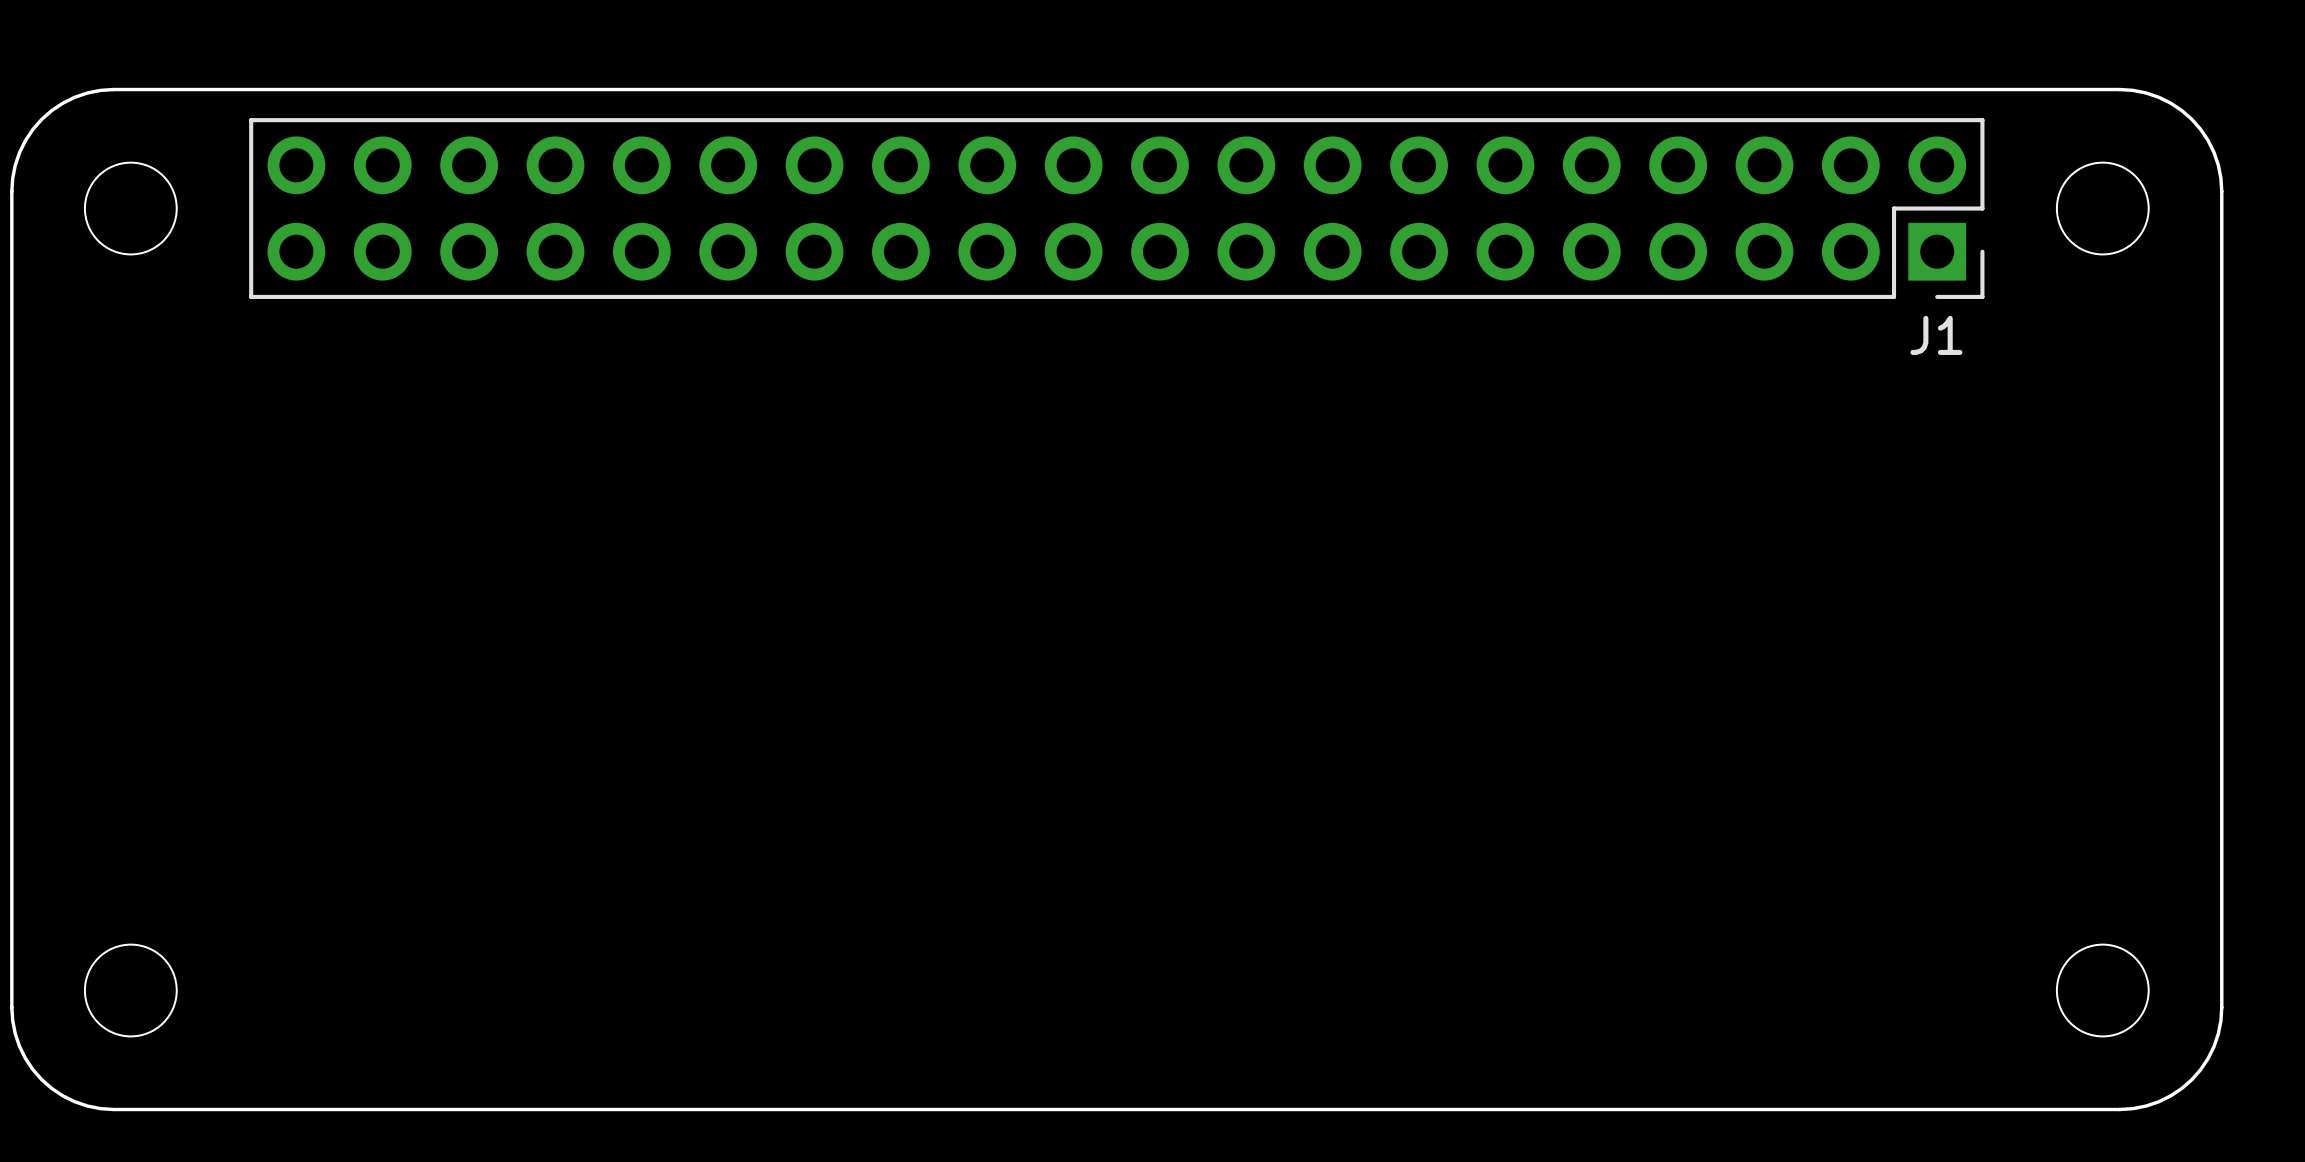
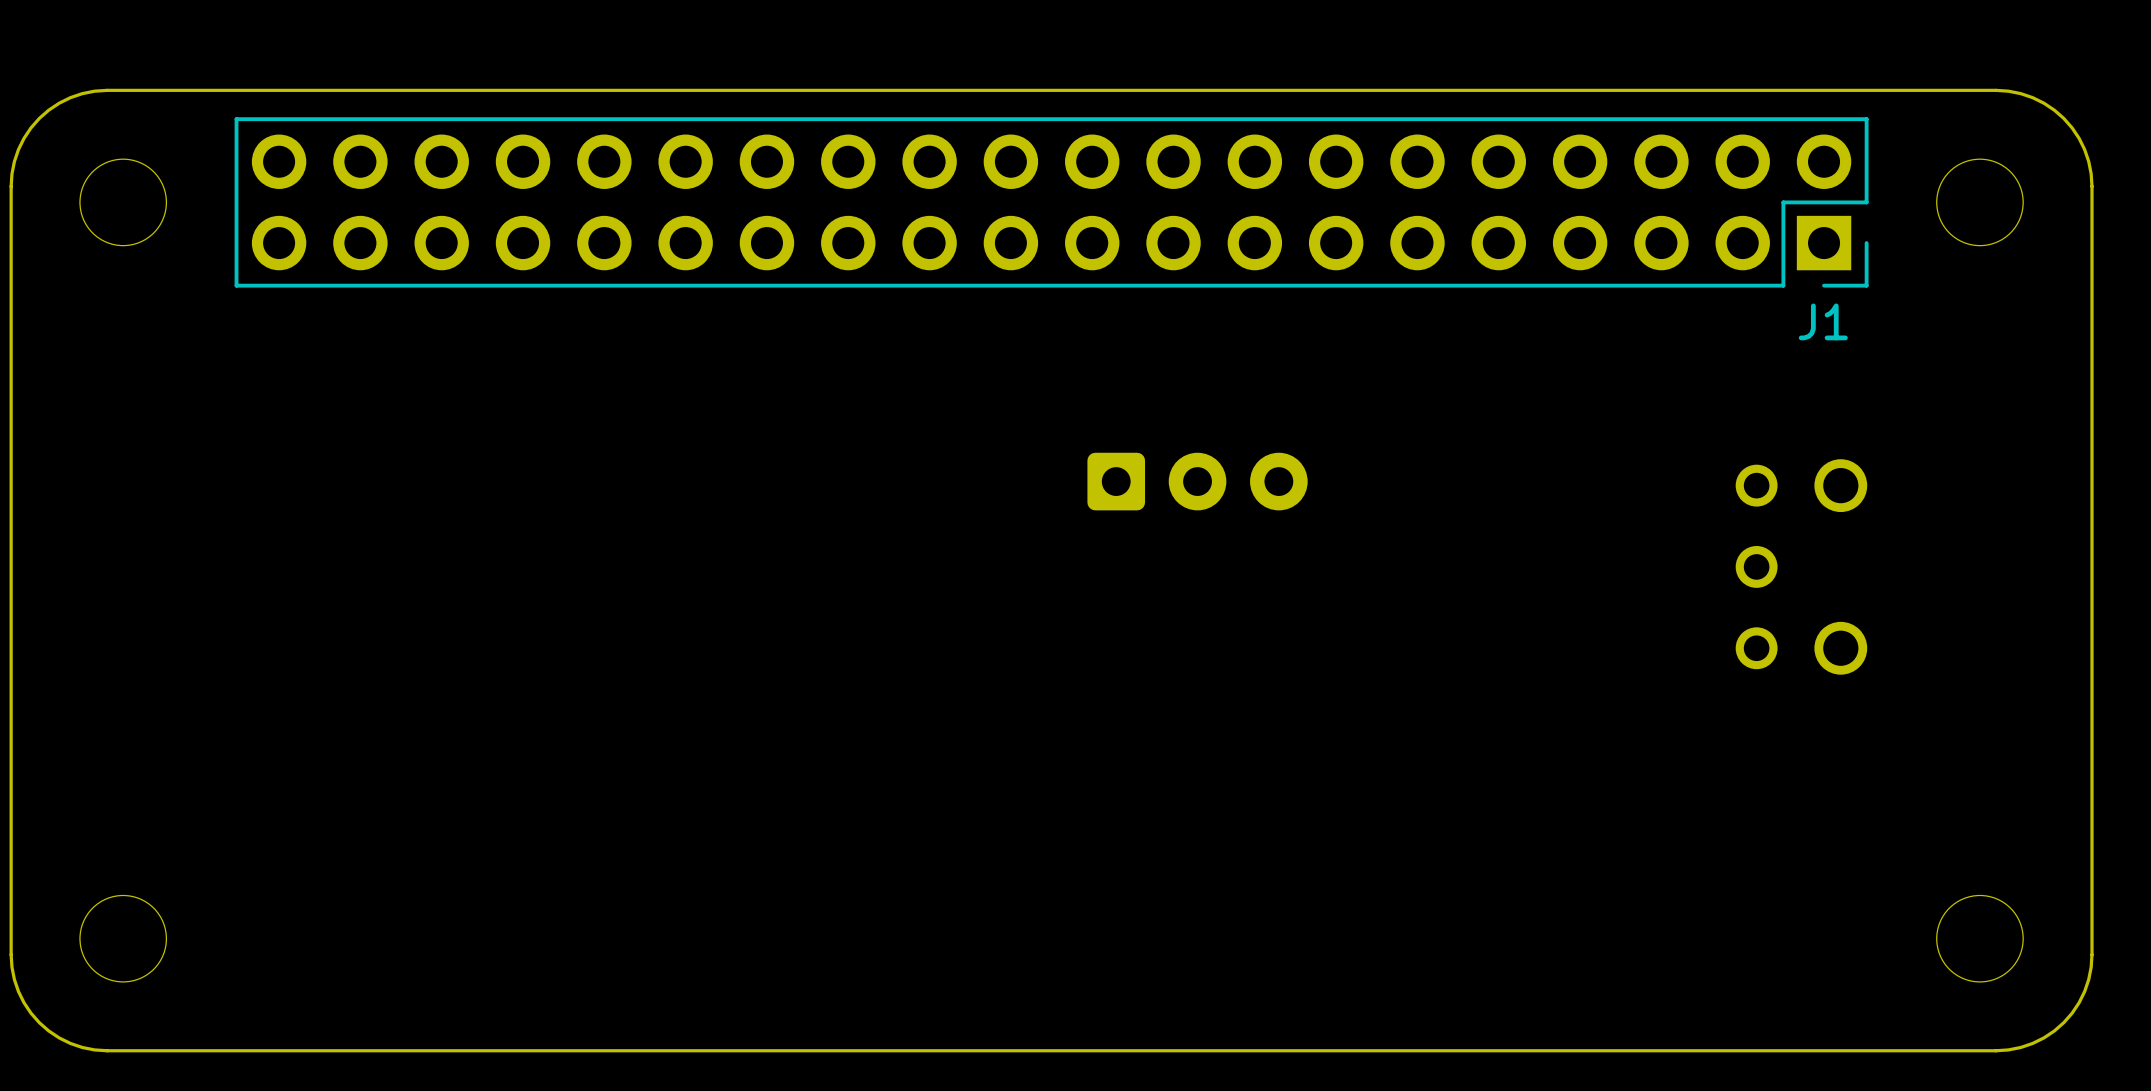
part: none -> (1197, 481)
part: none -> (1801, 566)

